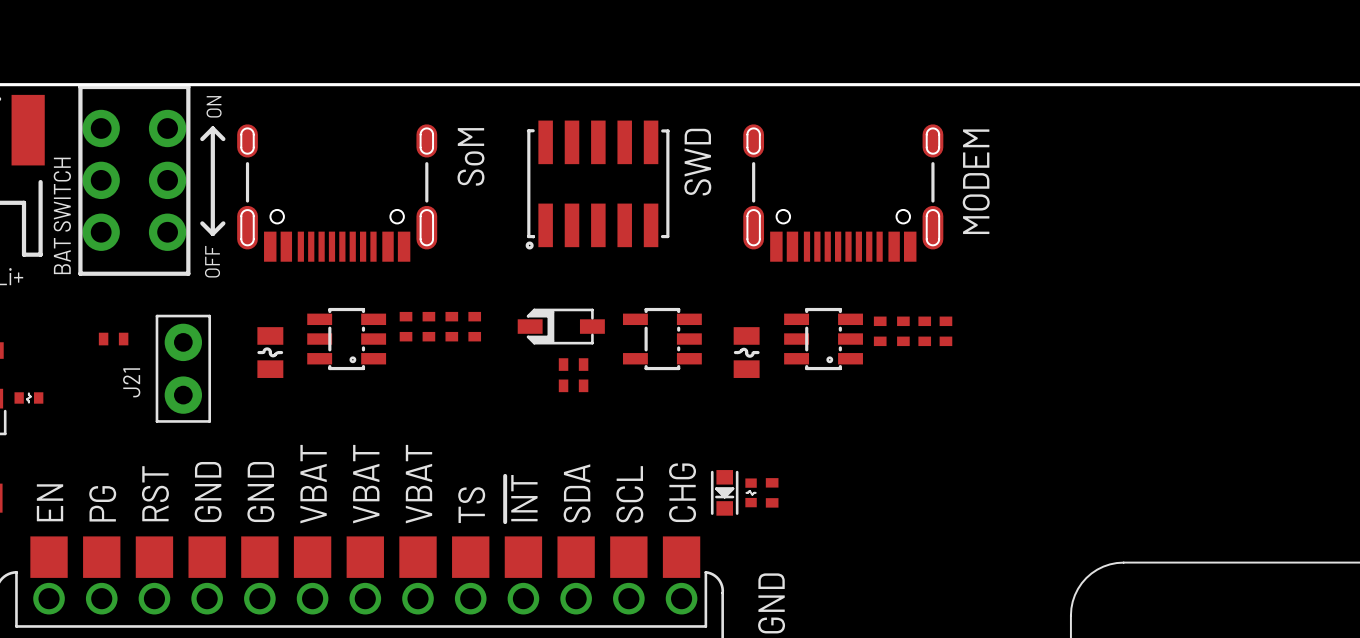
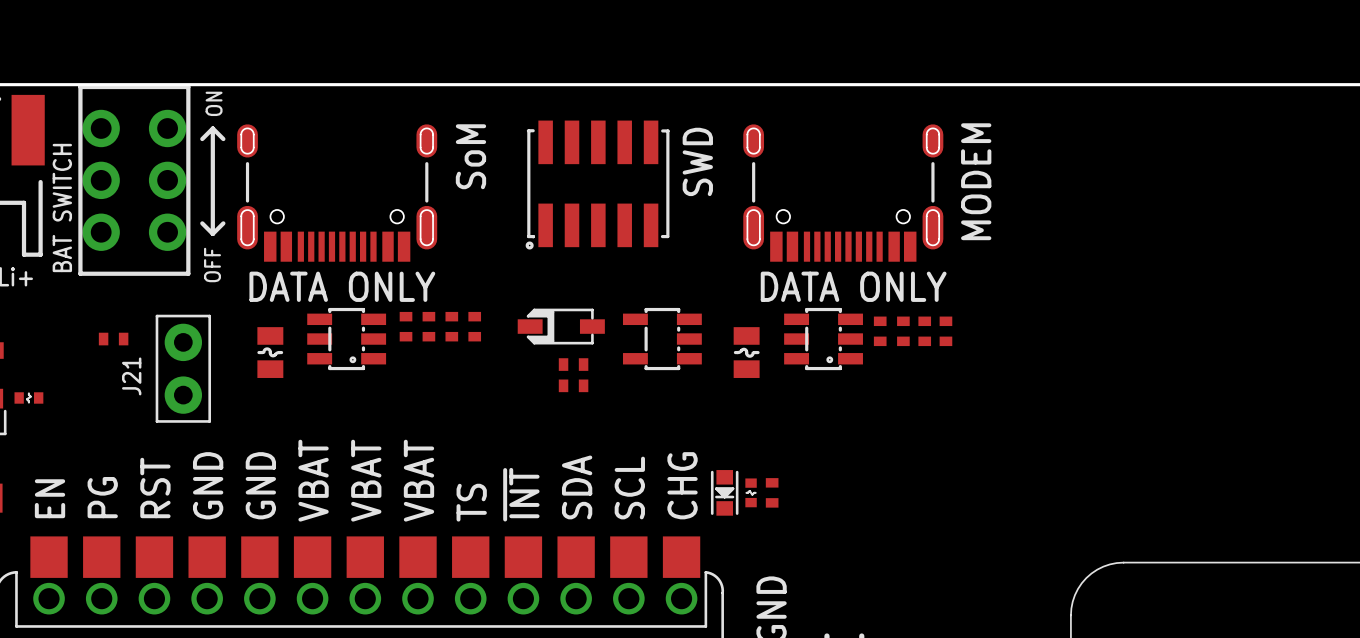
text: none -> DATA ONLY (342, 286)
text: none -> DATA ONLY (853, 286)

